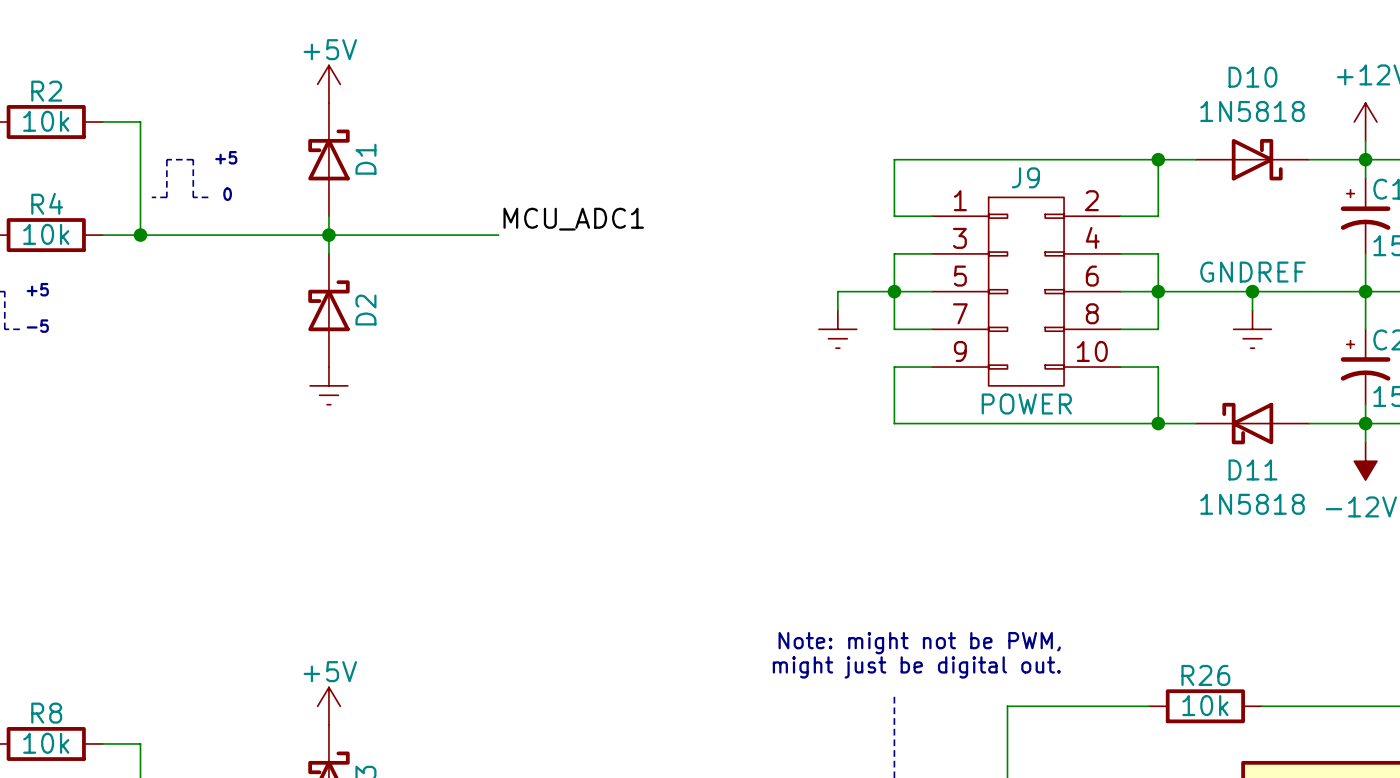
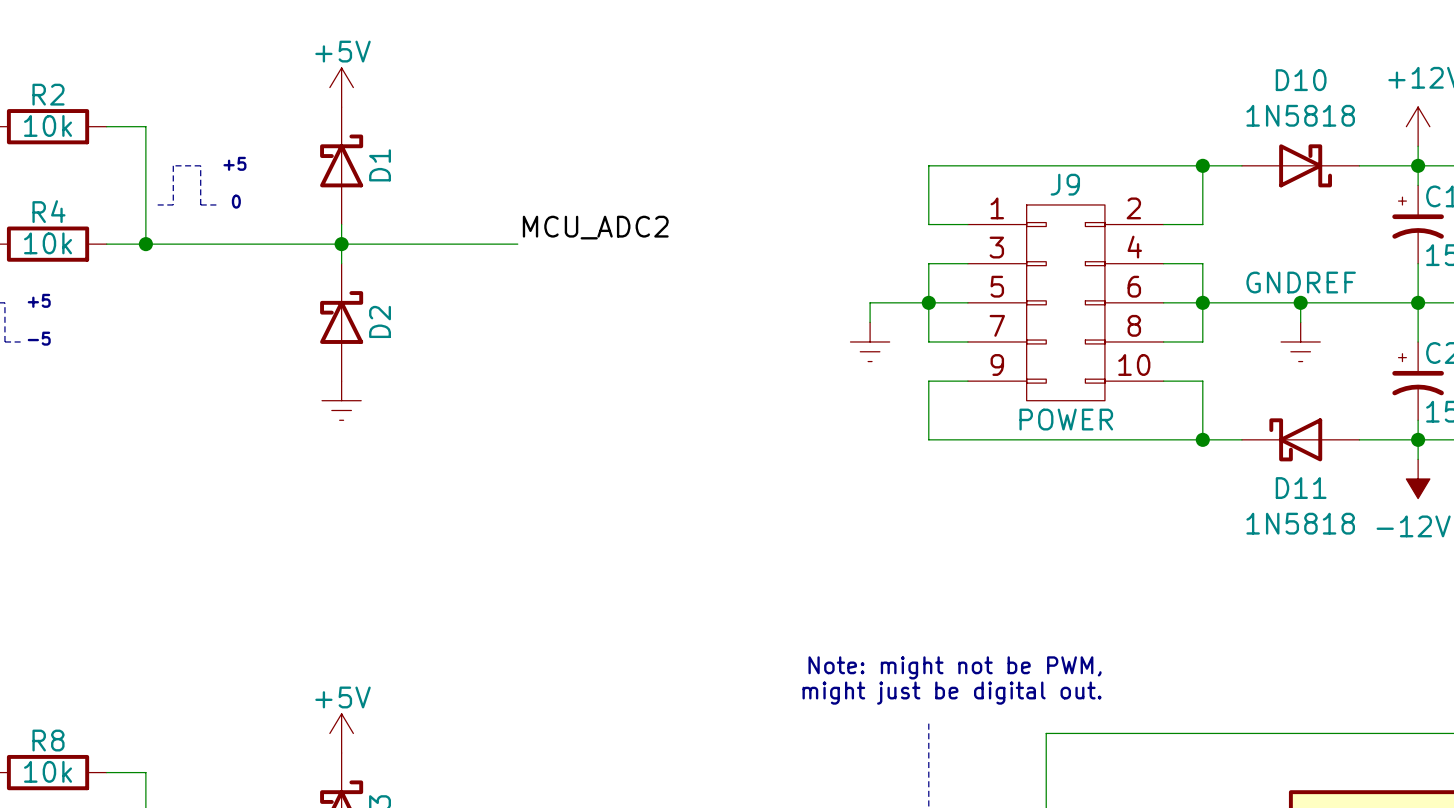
label: MCU_ADC1 (573, 219) -> MCU_ADC2 (595, 227)
wire: none -> (1193, 733) (1310, 733)
R26: 10k (1205, 706) -> none

